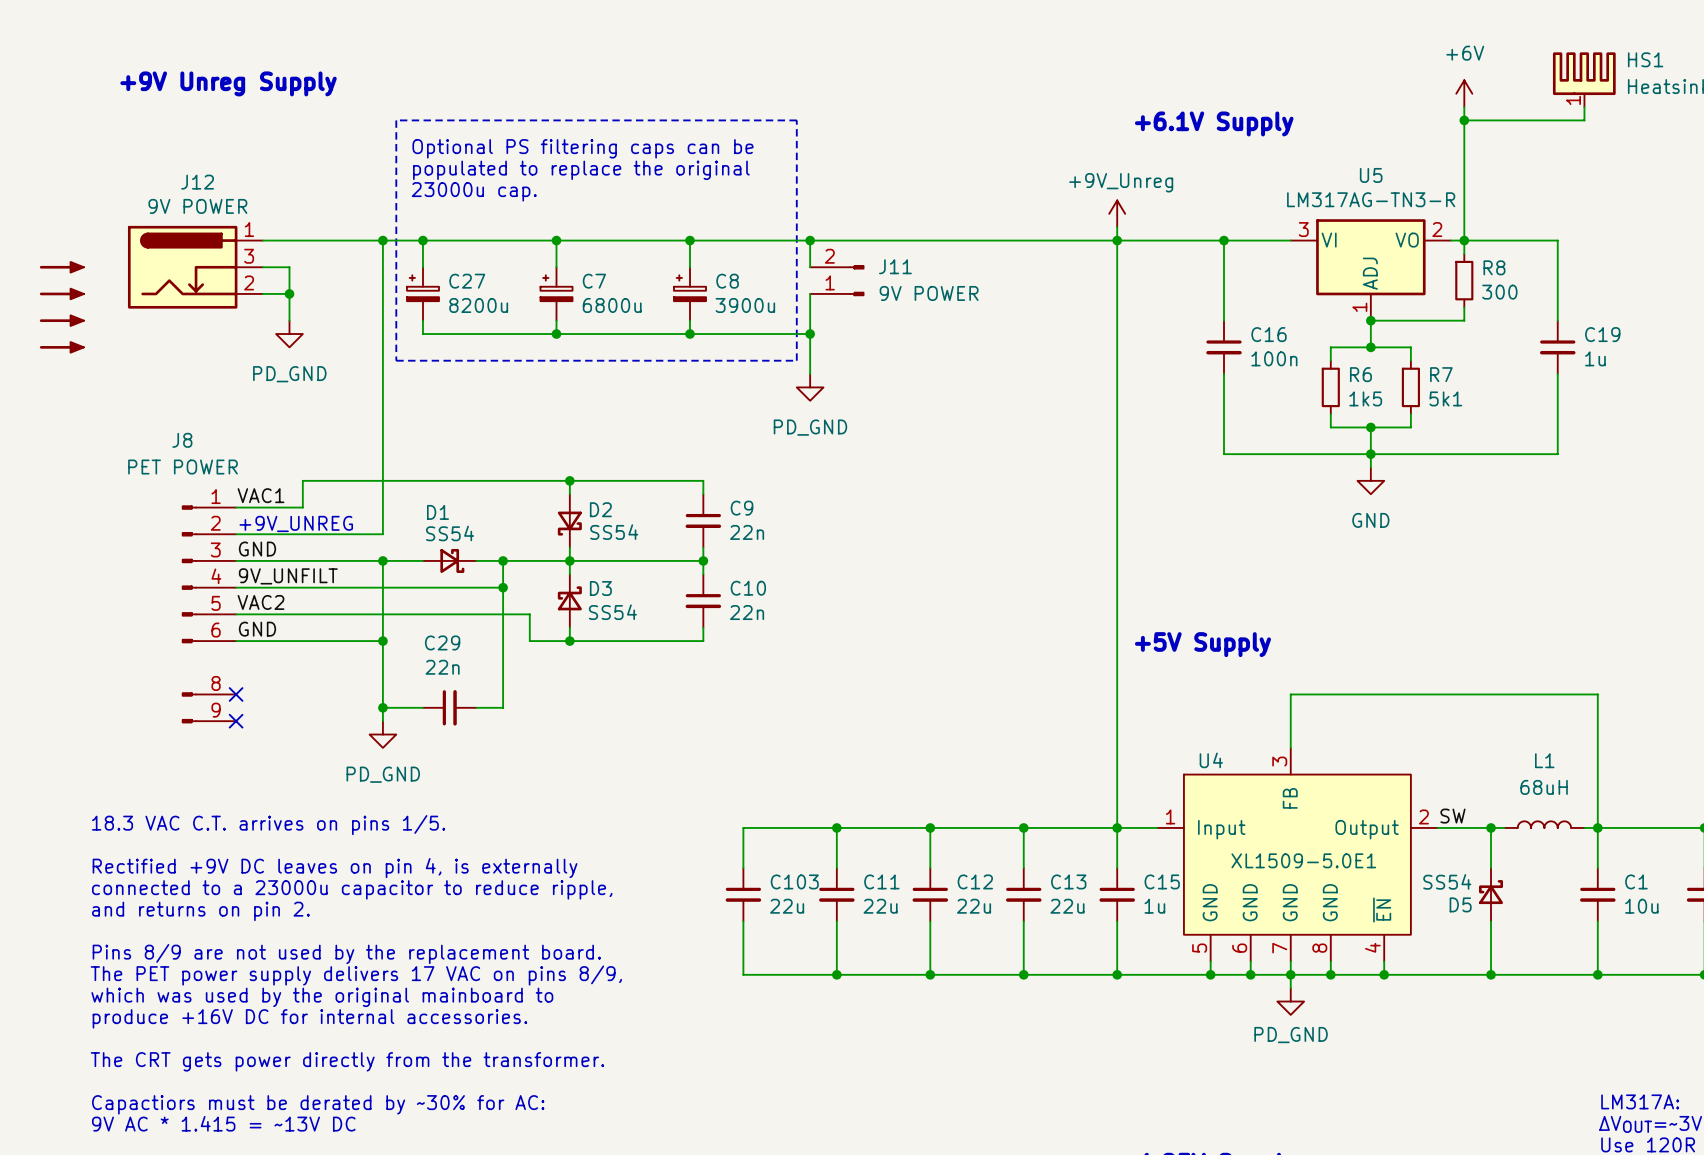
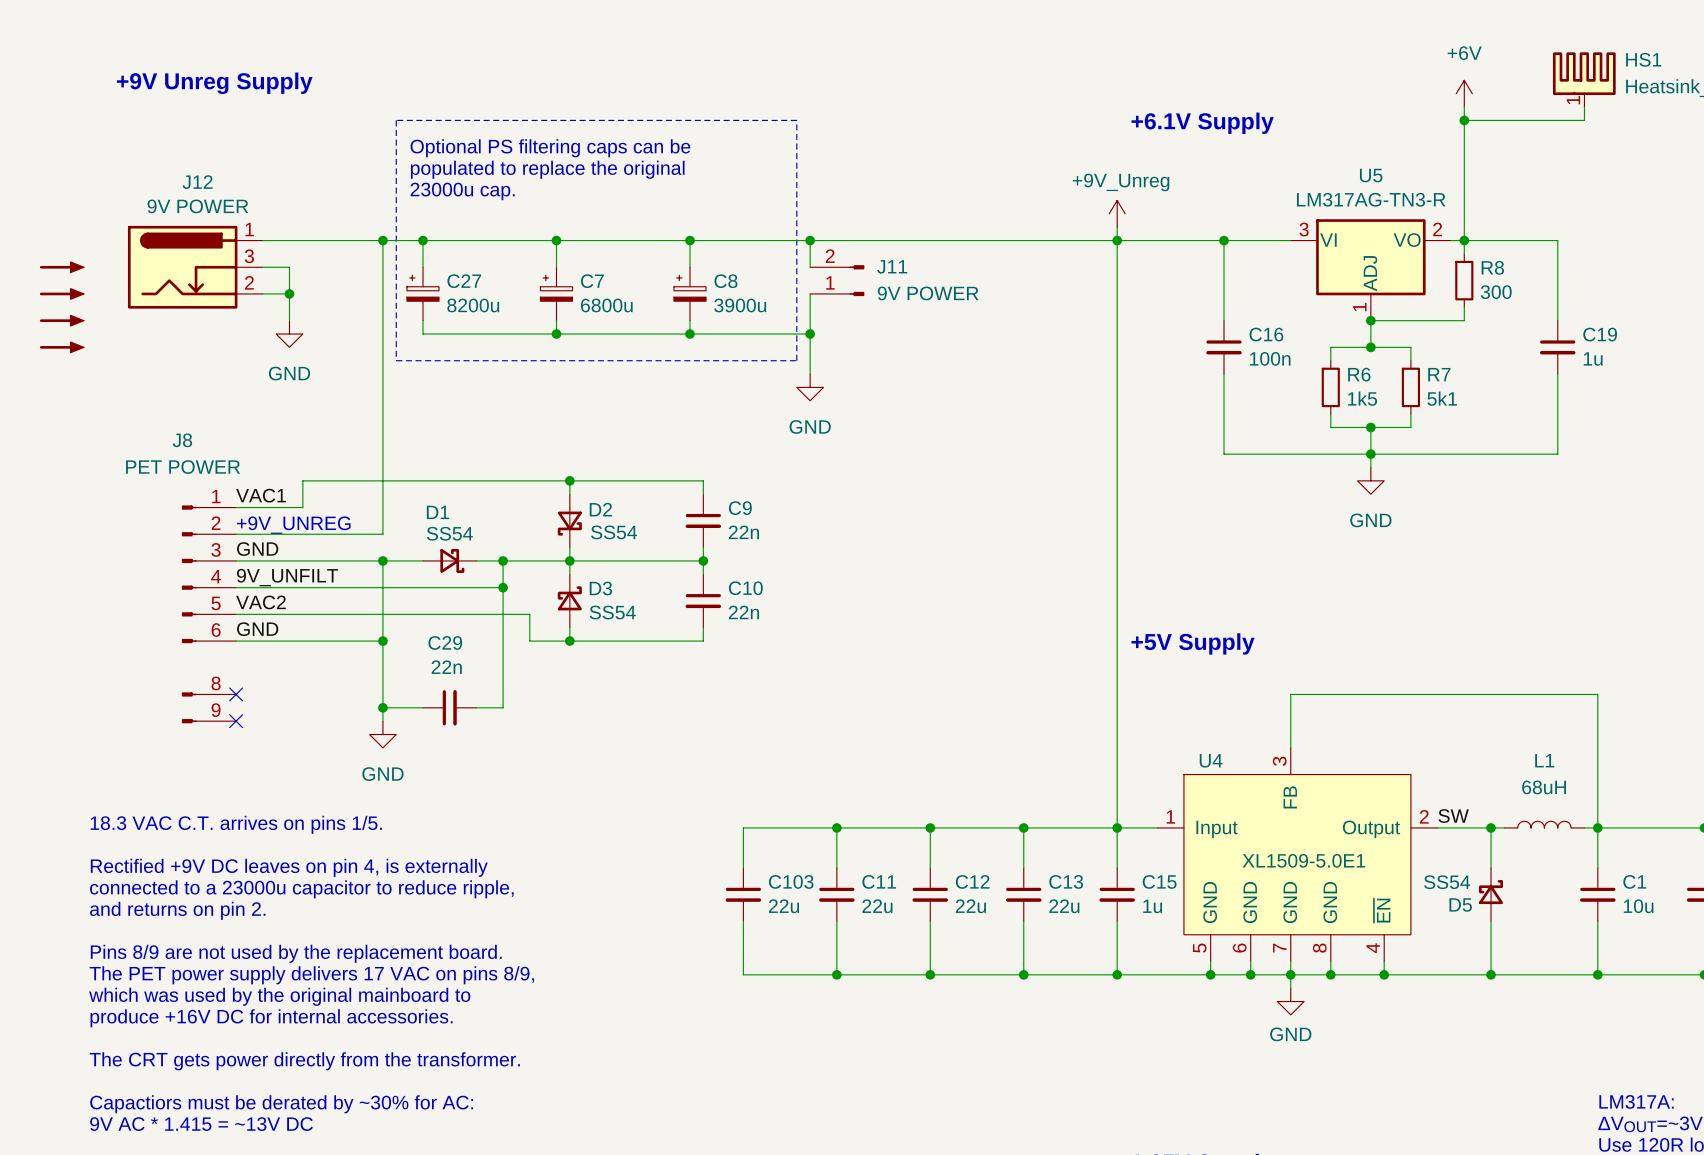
power symbol: PD_GND (289, 334) -> GND (289, 334)
power symbol: PD_GND (810, 387) -> GND (810, 387)
power symbol: PD_GND (382, 734) -> GND (382, 734)
power symbol: PD_GND (1290, 1001) -> GND (1290, 1001)

